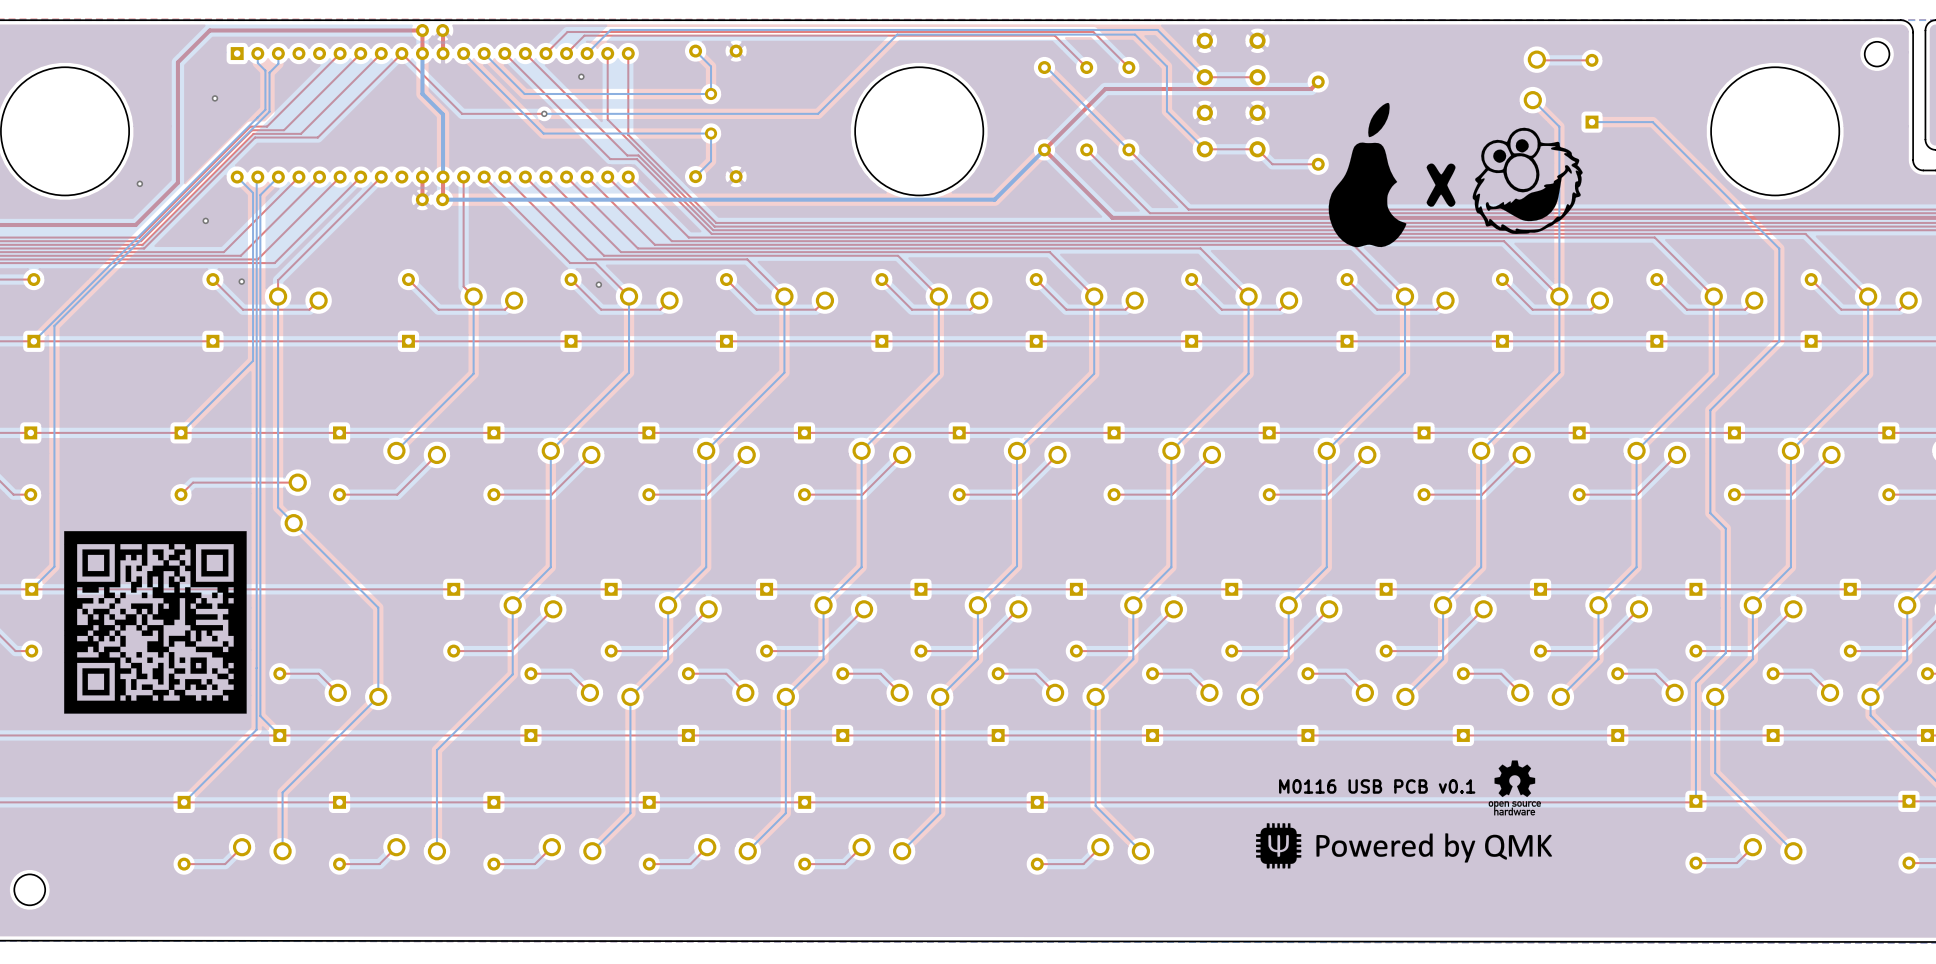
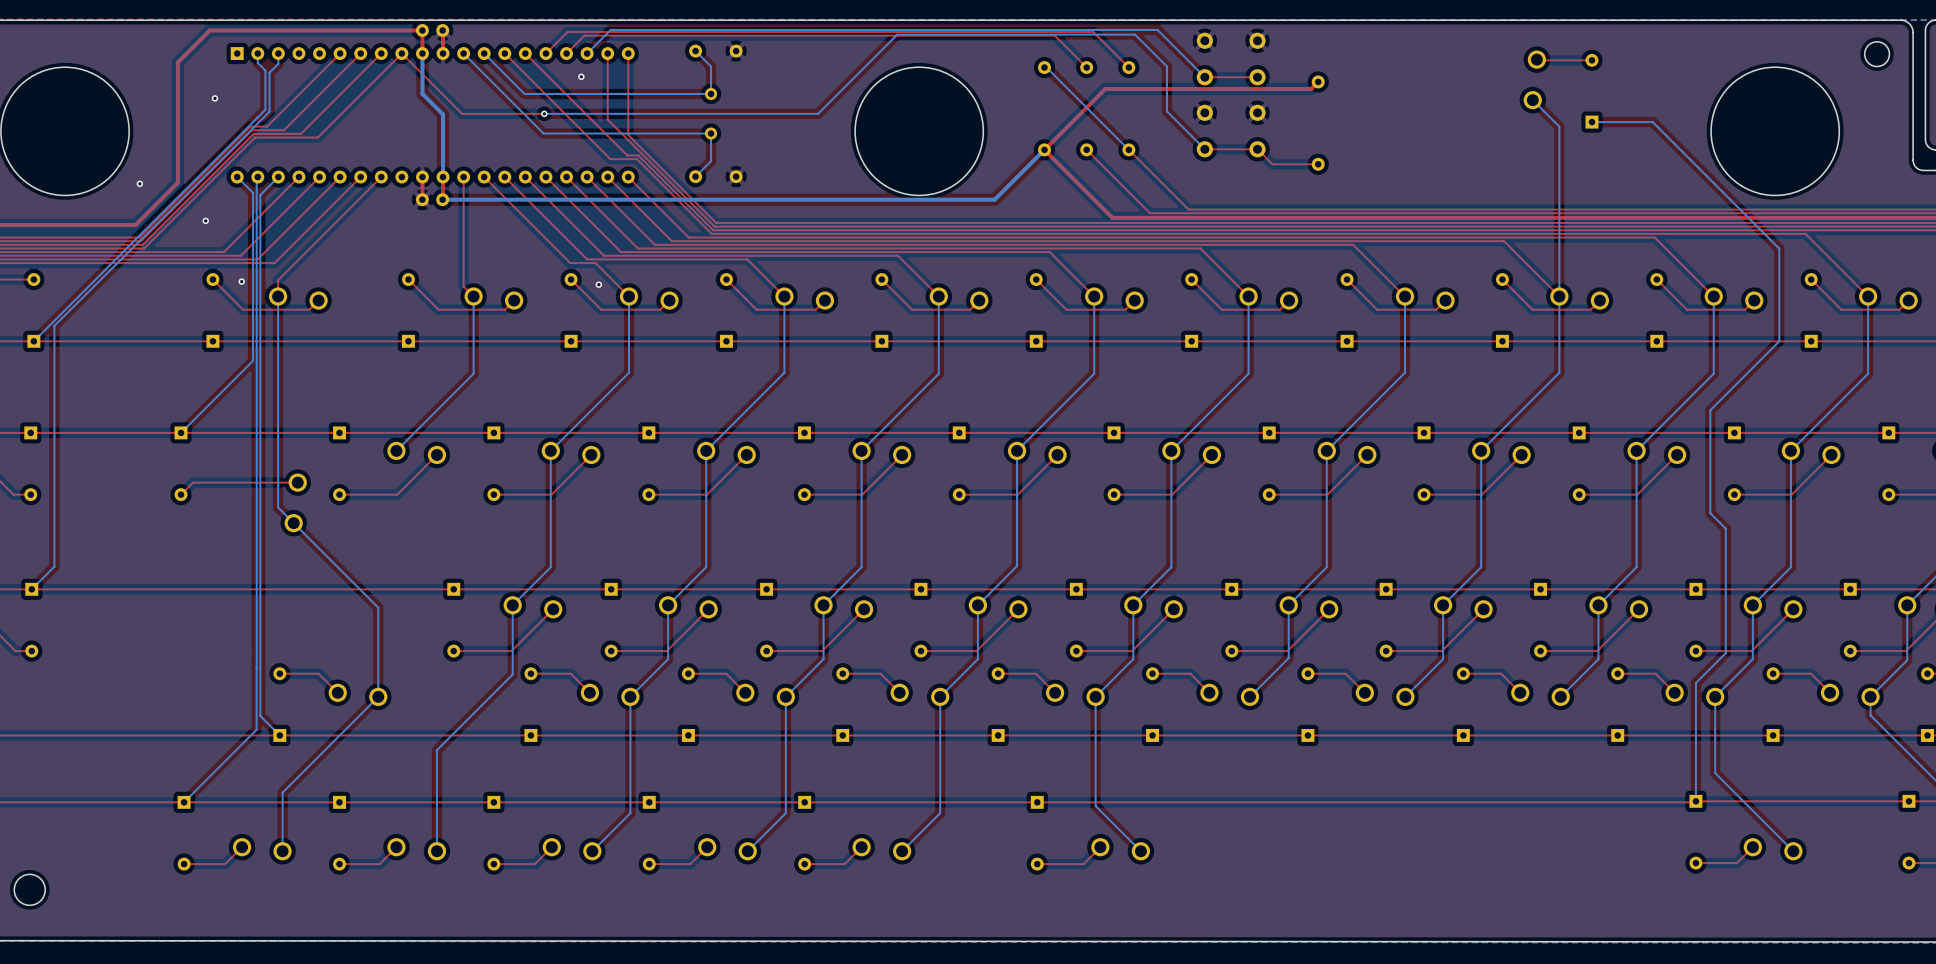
drawing: [1328, 102, 1583, 248] -> none
drawing: [64, 531, 247, 714] -> none
drawing: [1255, 760, 1553, 869] -> none
text: M0116 USB PCB v0.1 (1377, 786) -> none

